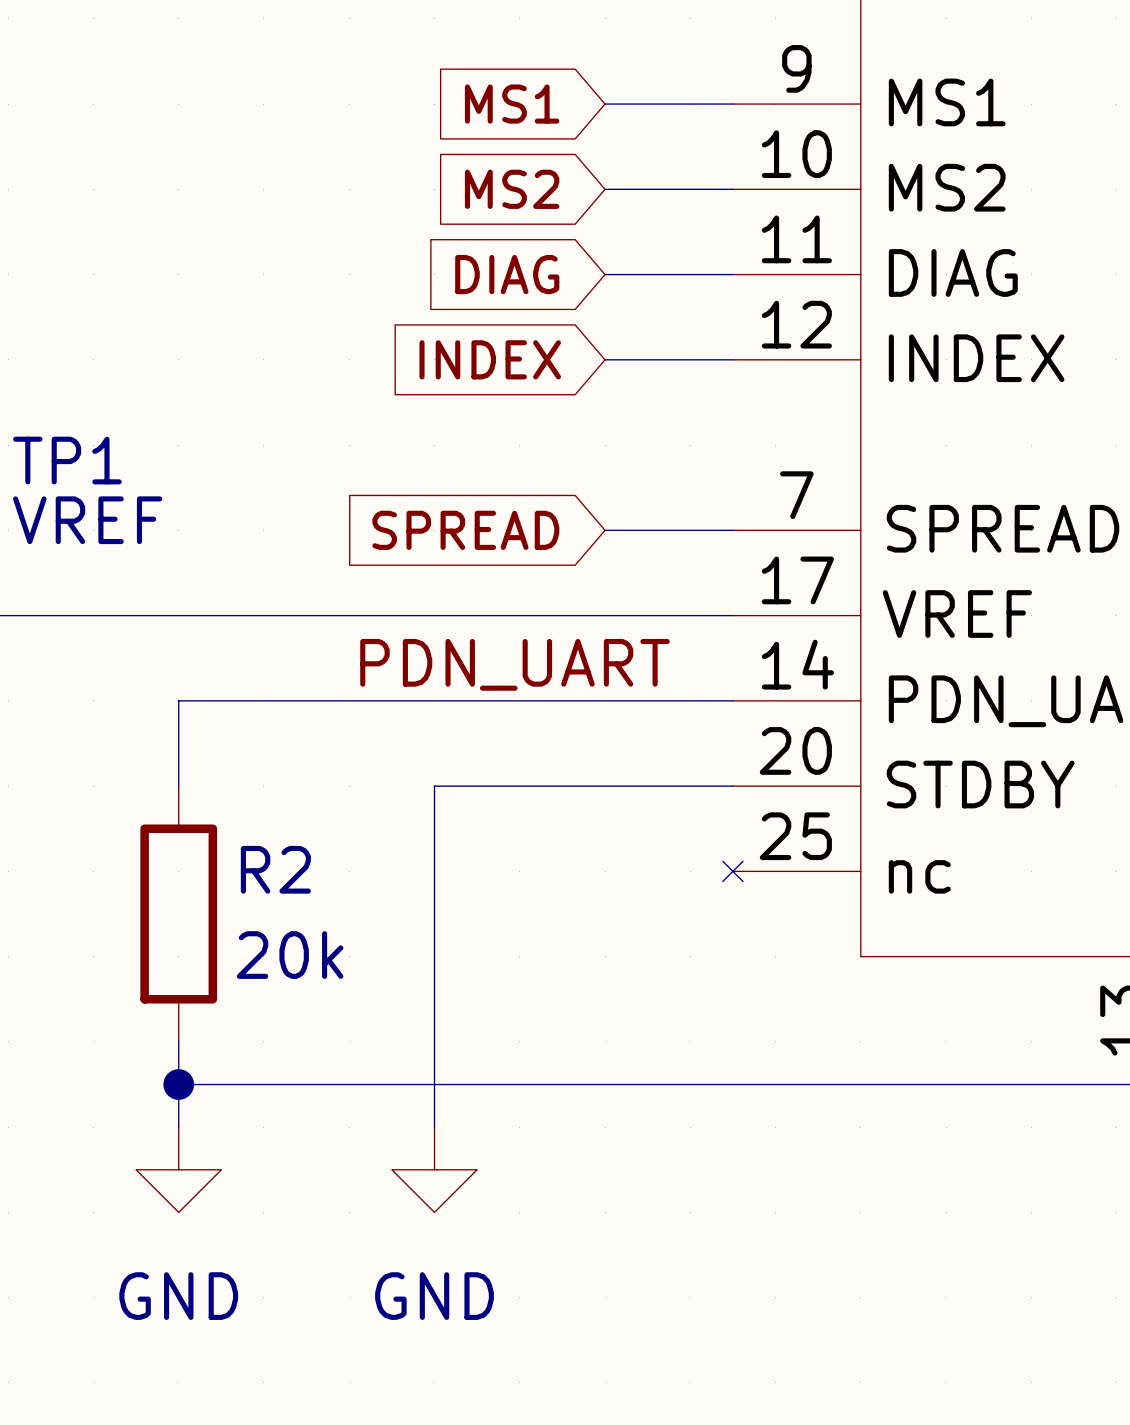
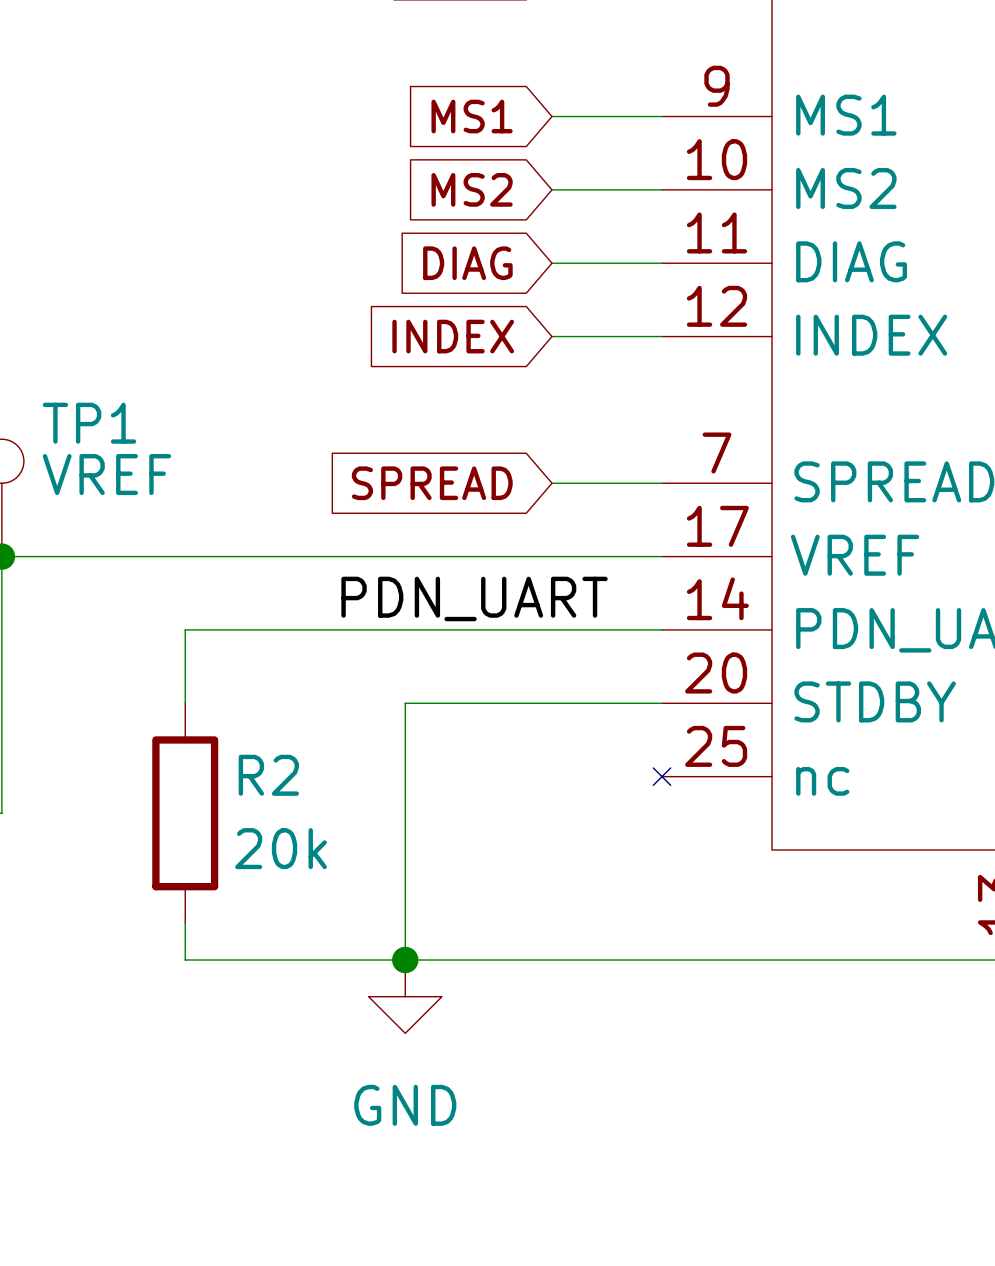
wire: (178, 1084) (178, 1127) -> none
junction: (178, 1084) -> none
junction: none -> (405, 960)
power symbol: GND (178, 1169) -> none
power symbol position: GND (434, 1169) -> GND (405, 996)

